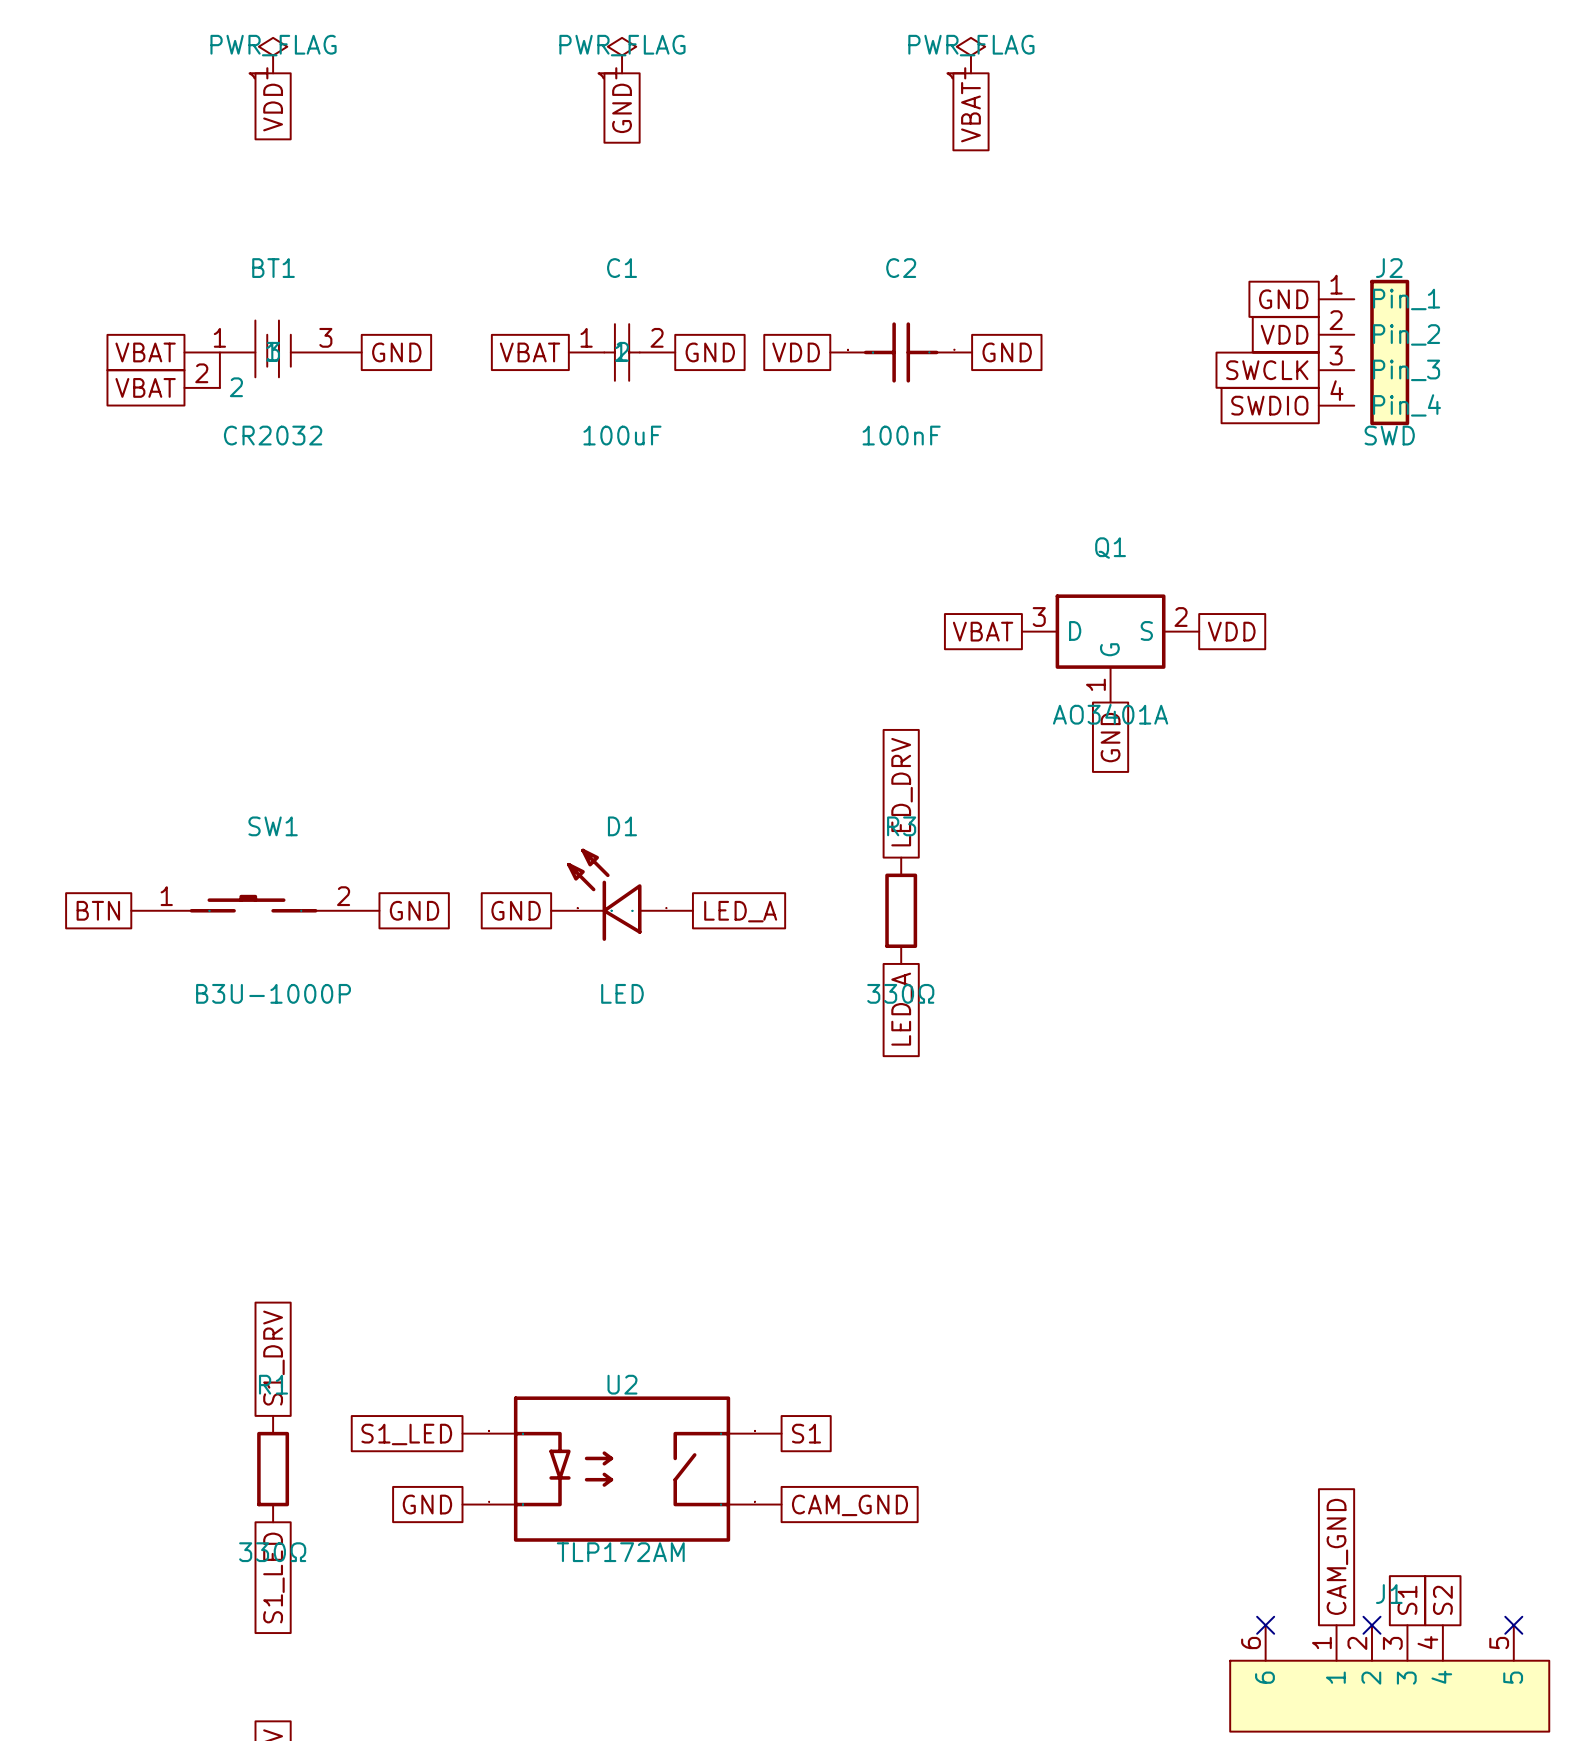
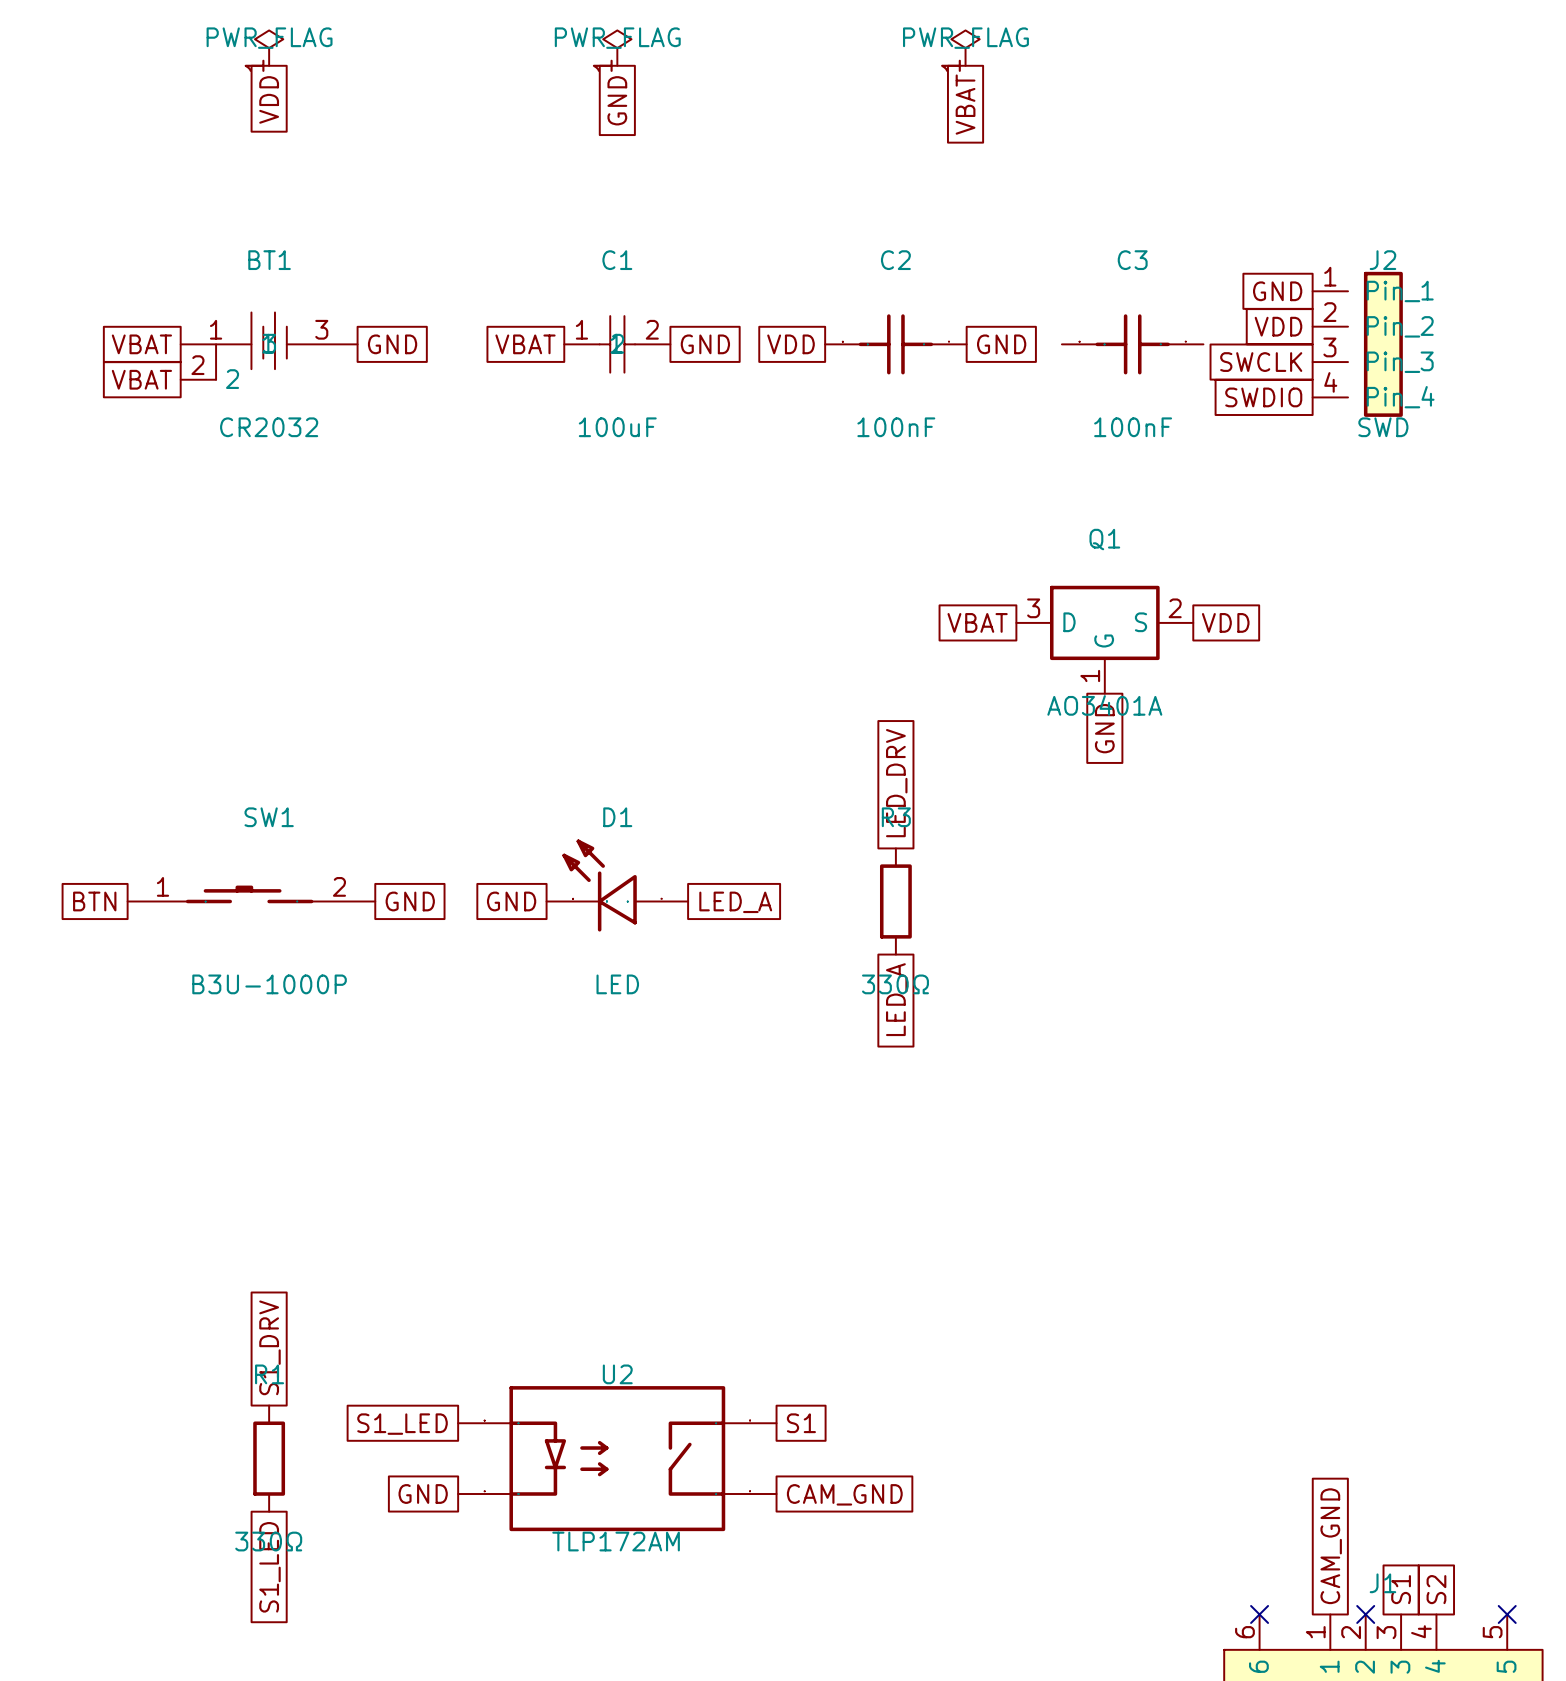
C3: none -> 100nF (1132, 344)

